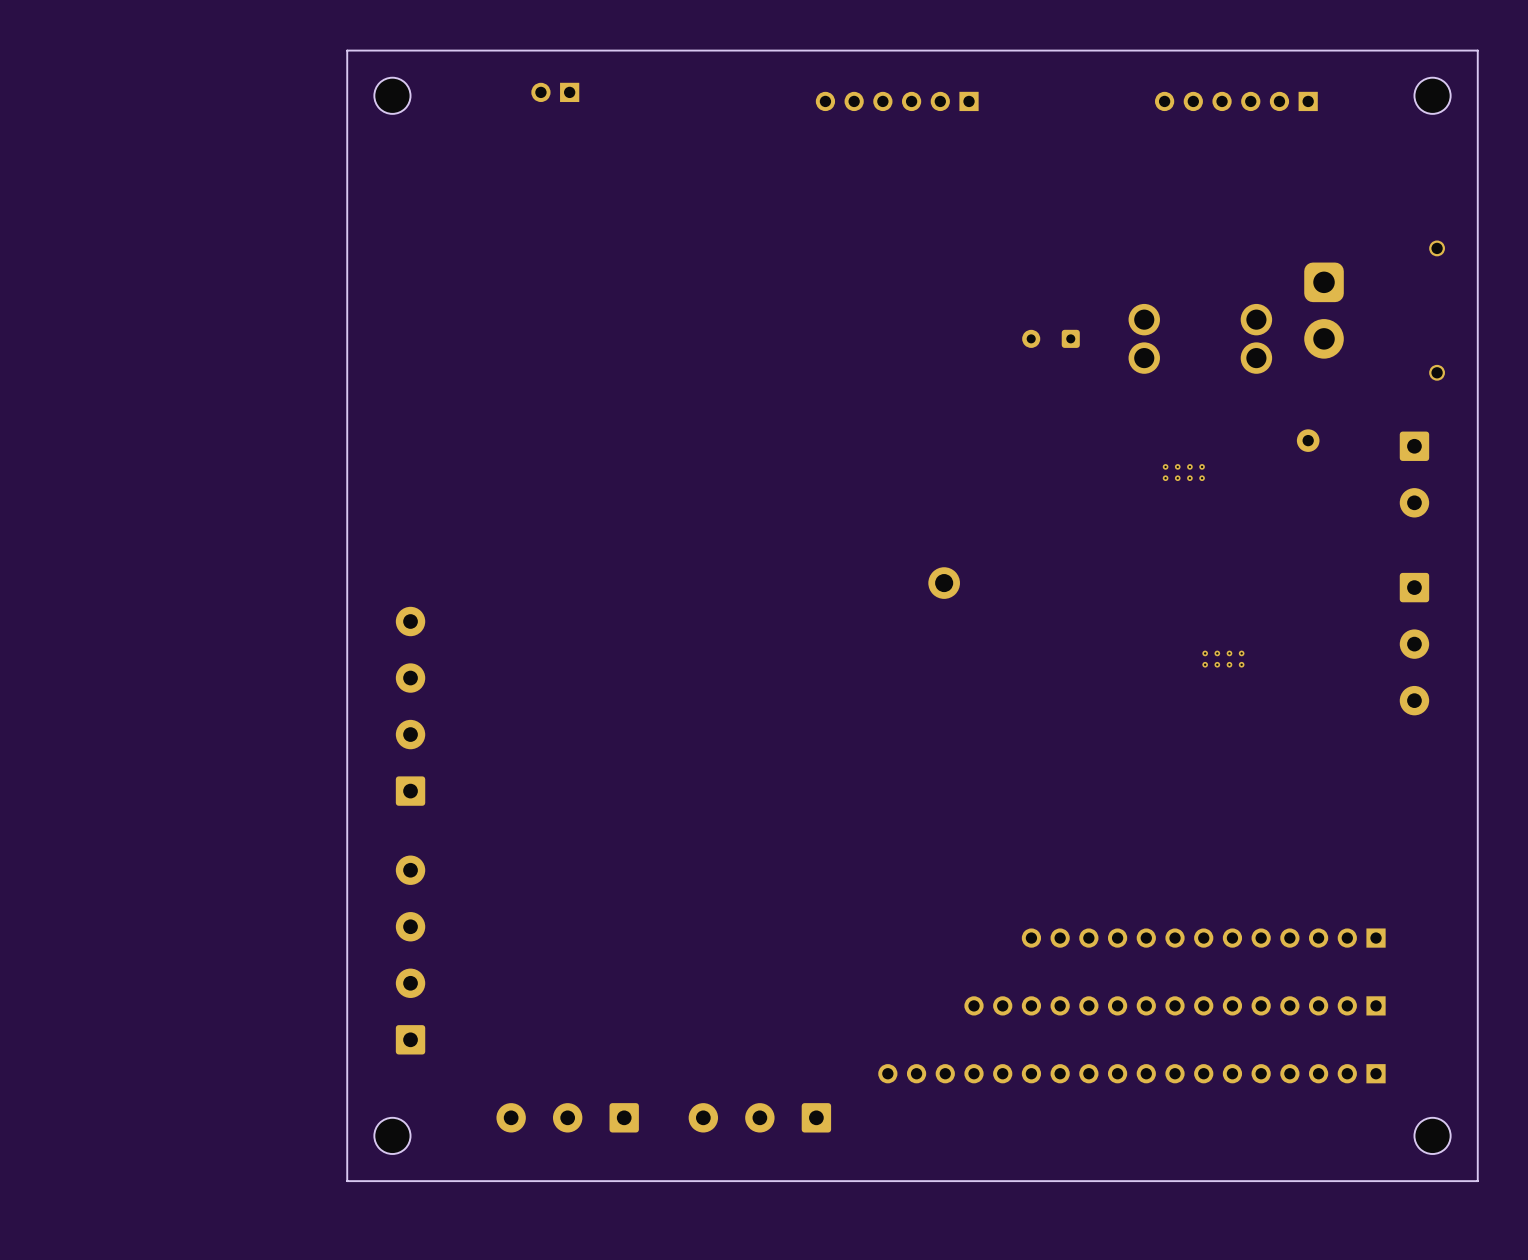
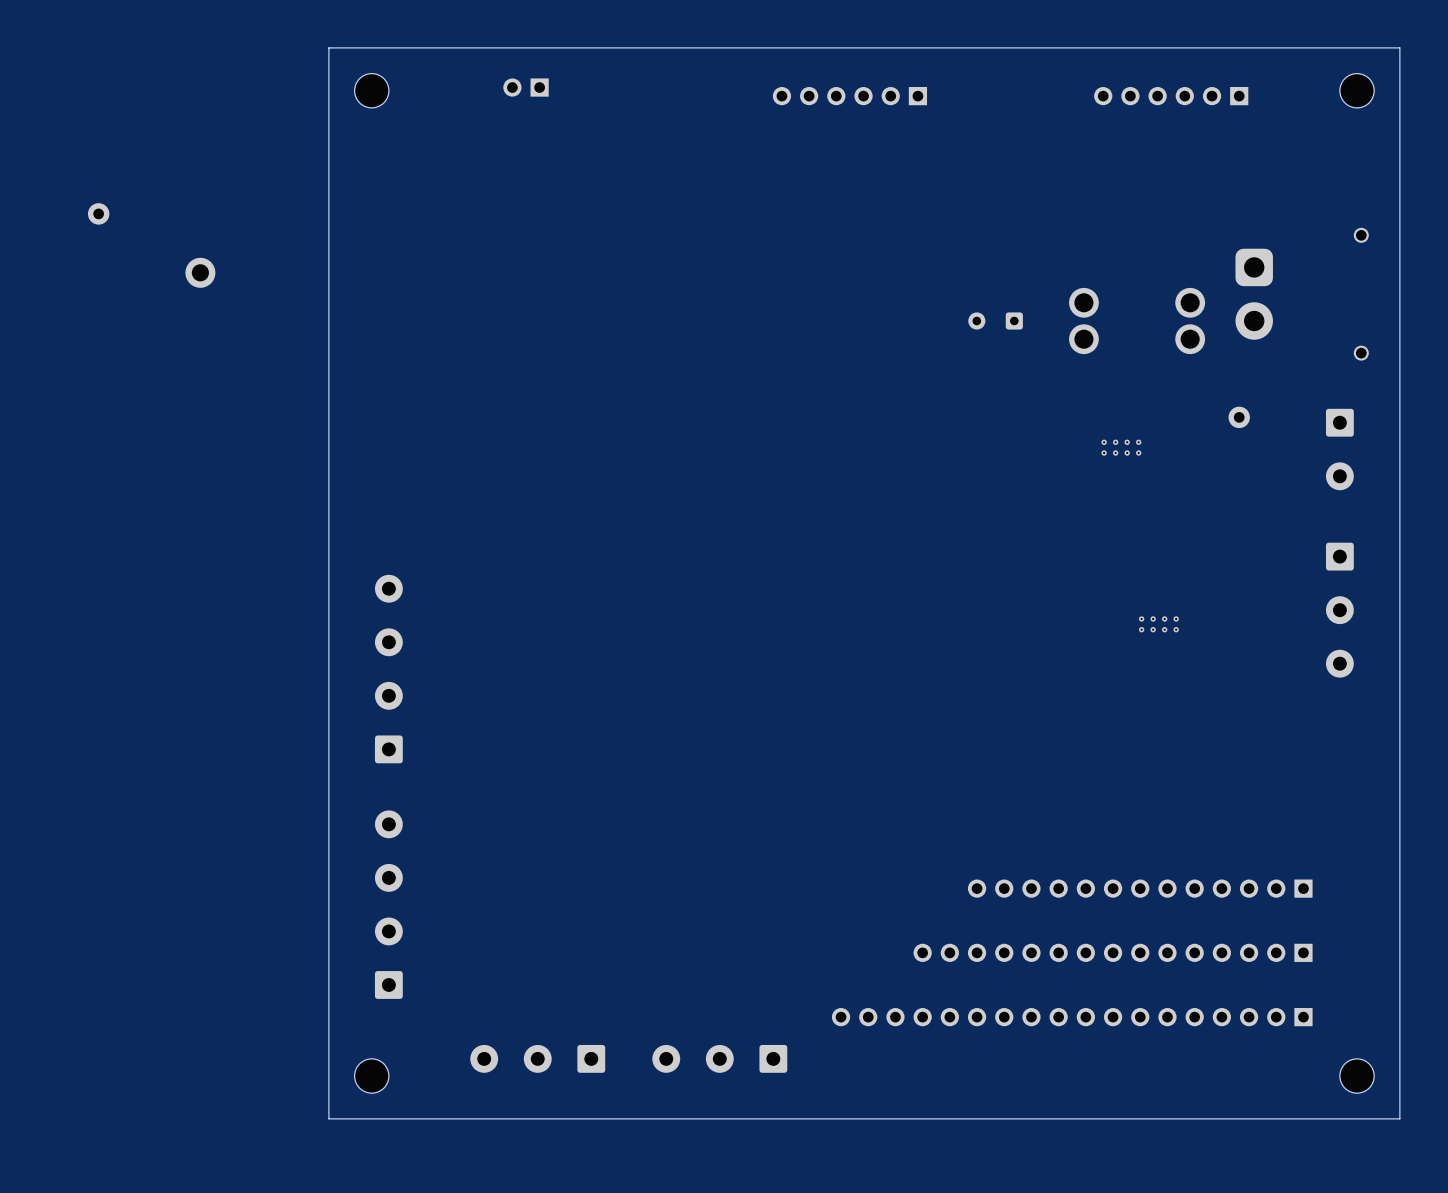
part: none -> (98, 213)
part: none -> (200, 272)
part: (944, 583) -> none

